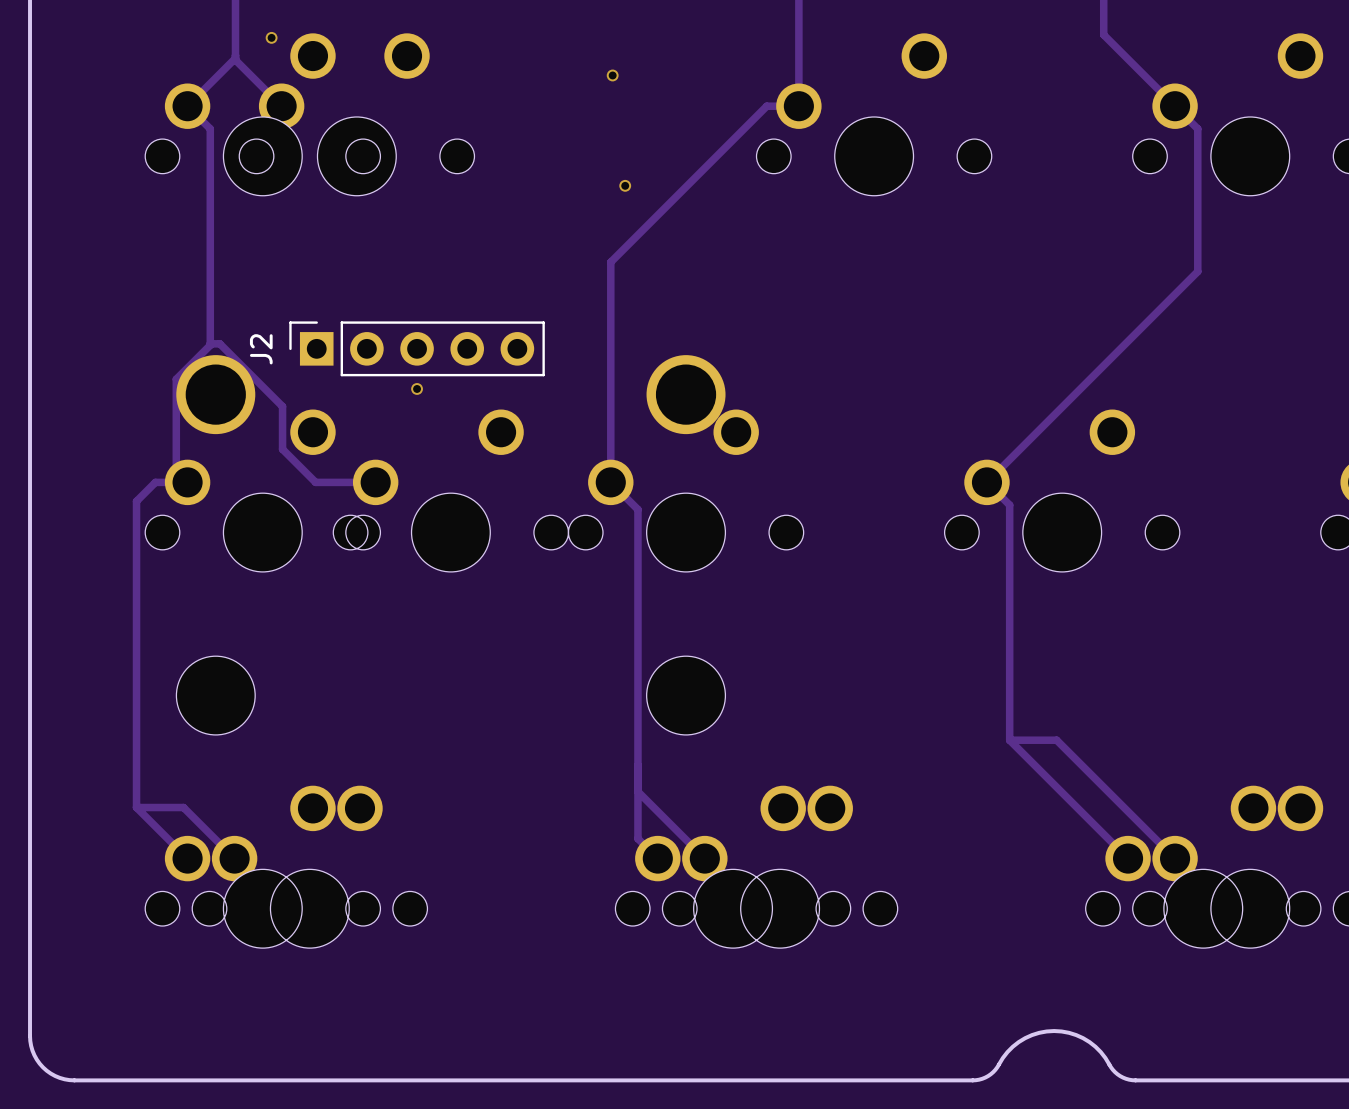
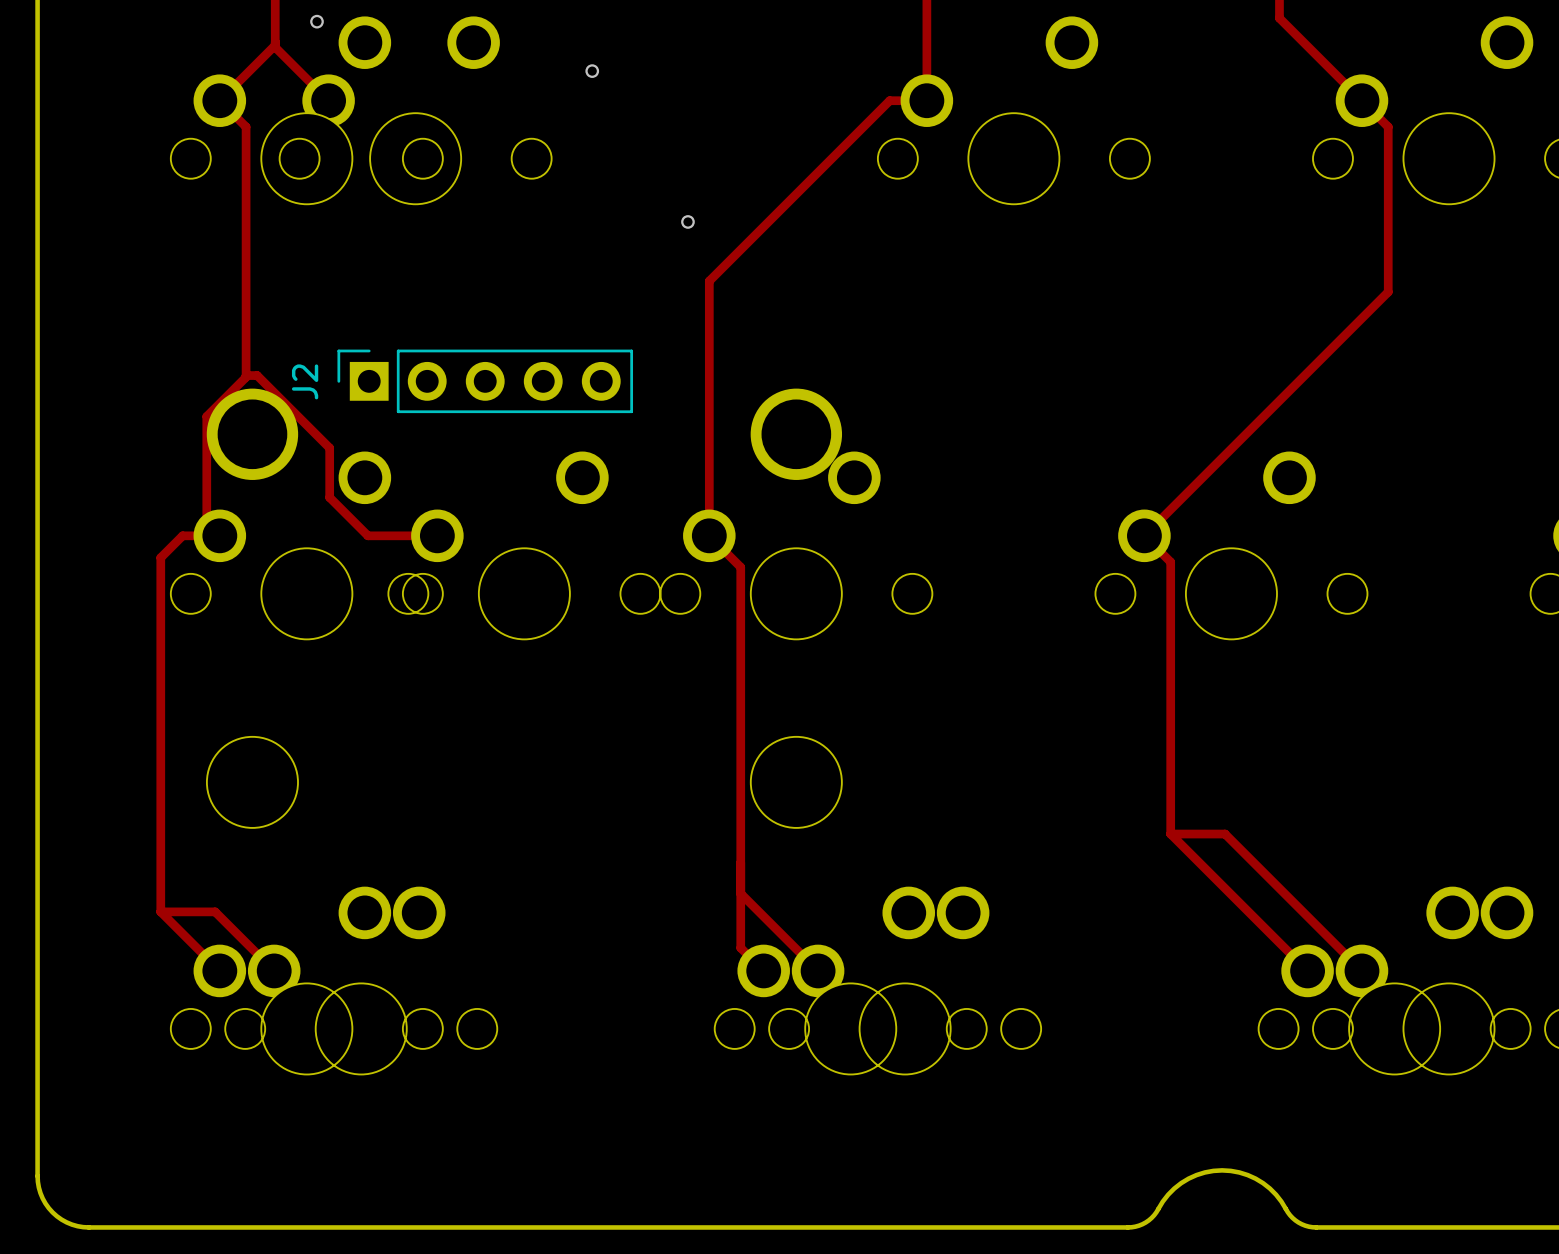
via: (612, 75) -> none
via: none -> (592, 71)
via position: (625, 185) -> (687, 221)
via: (417, 388) -> none

